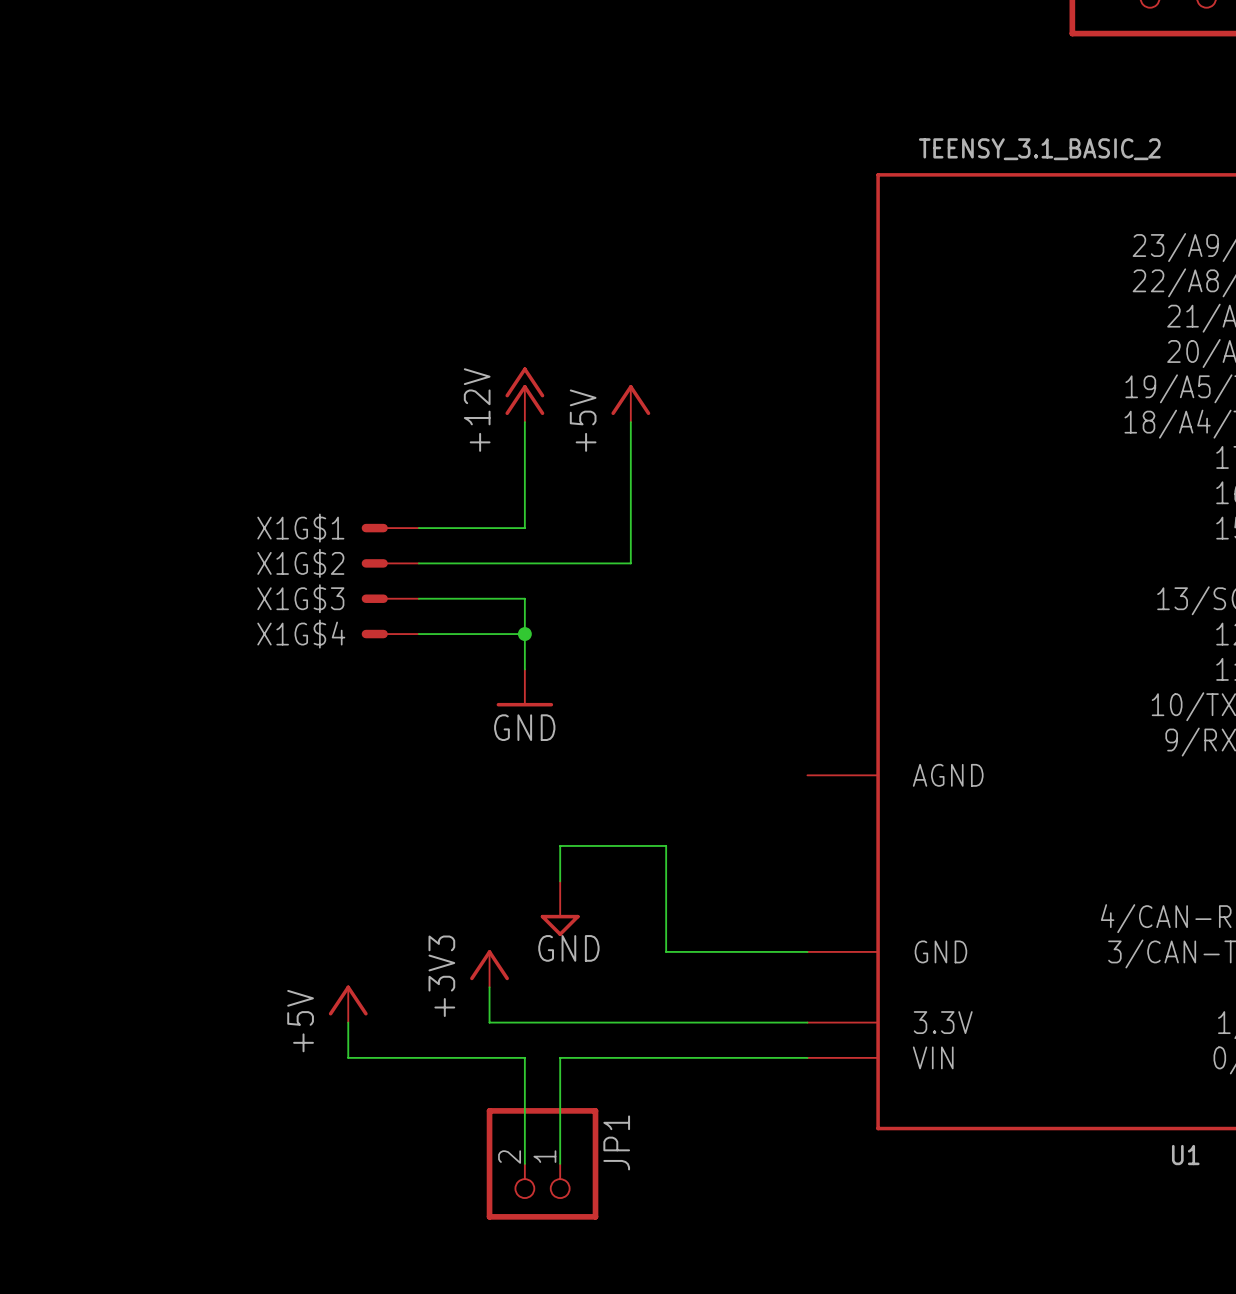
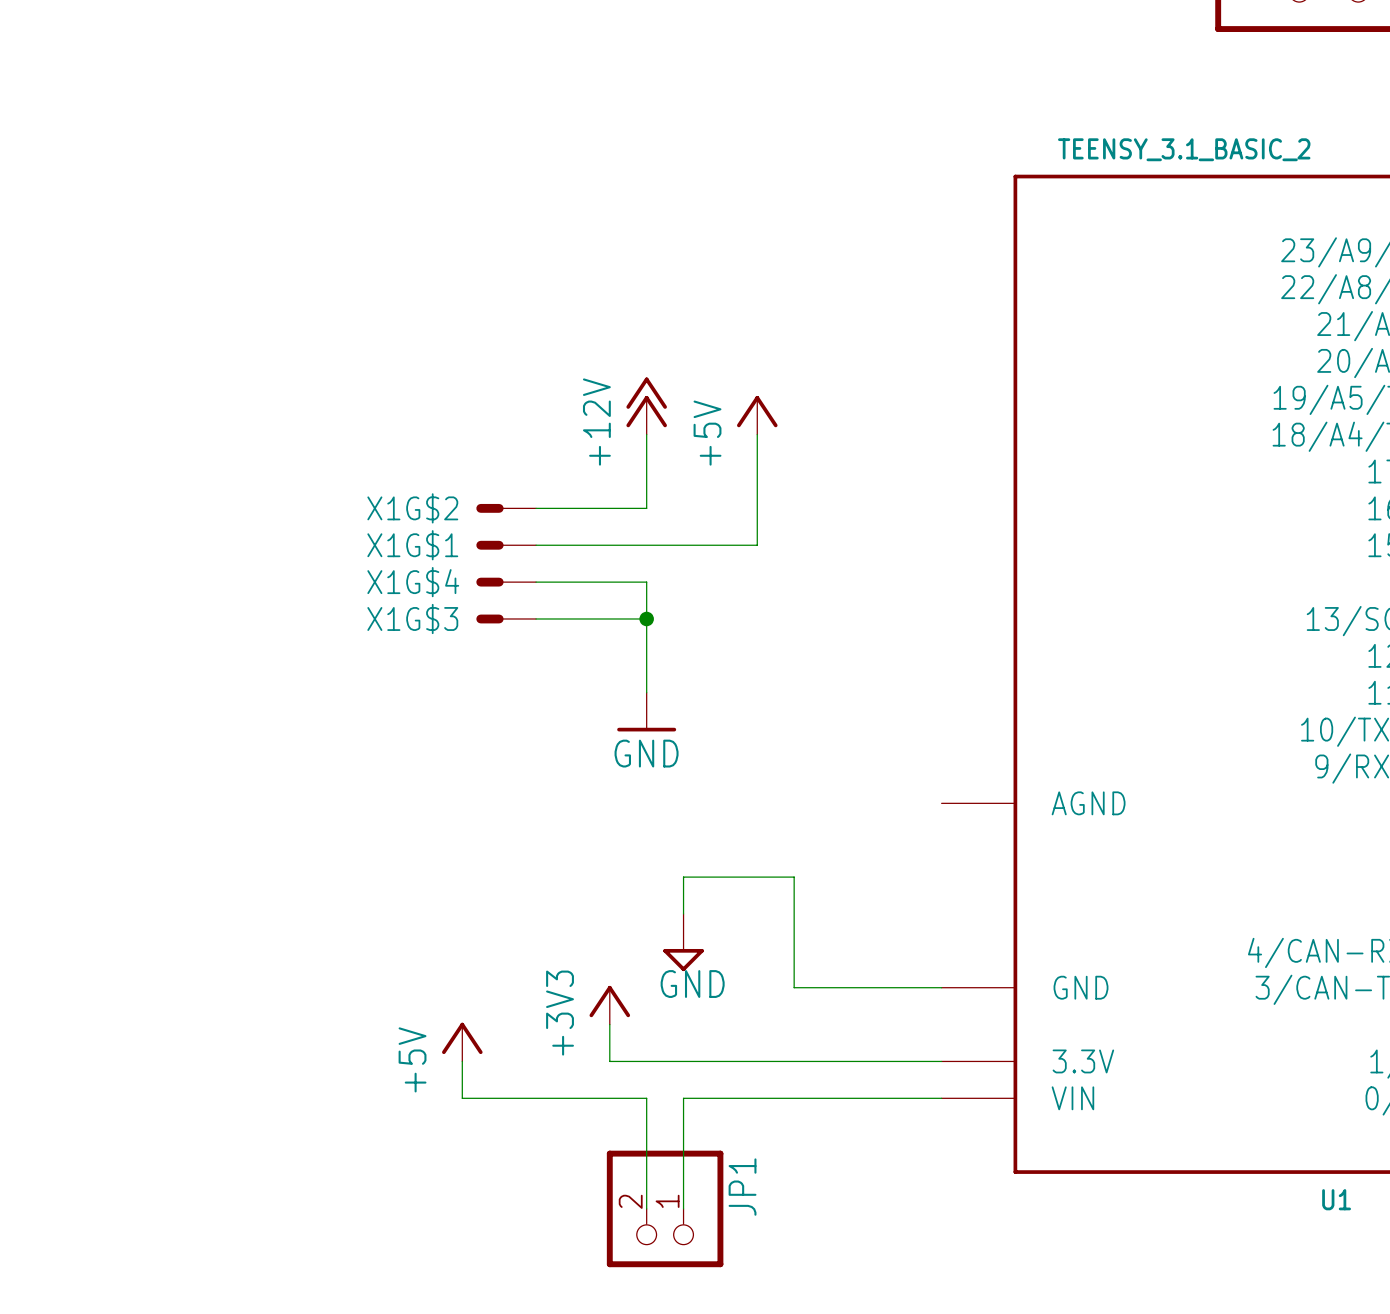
X1G$2: none -> (506, 508)
wire: (524, 492) (524, 528) -> (646, 508) (536, 508)
wire: (630, 528) (630, 563) (524, 563) -> (757, 545) (646, 545)
X1G$2 name: X1G$2 (300, 563) -> X1G$4 (413, 582)
wire: none -> (646, 582) (646, 618)
X1G$4: (390, 634) -> none
wire: (418, 634) (524, 634) -> none
junction position: (524, 634) -> (646, 618)

